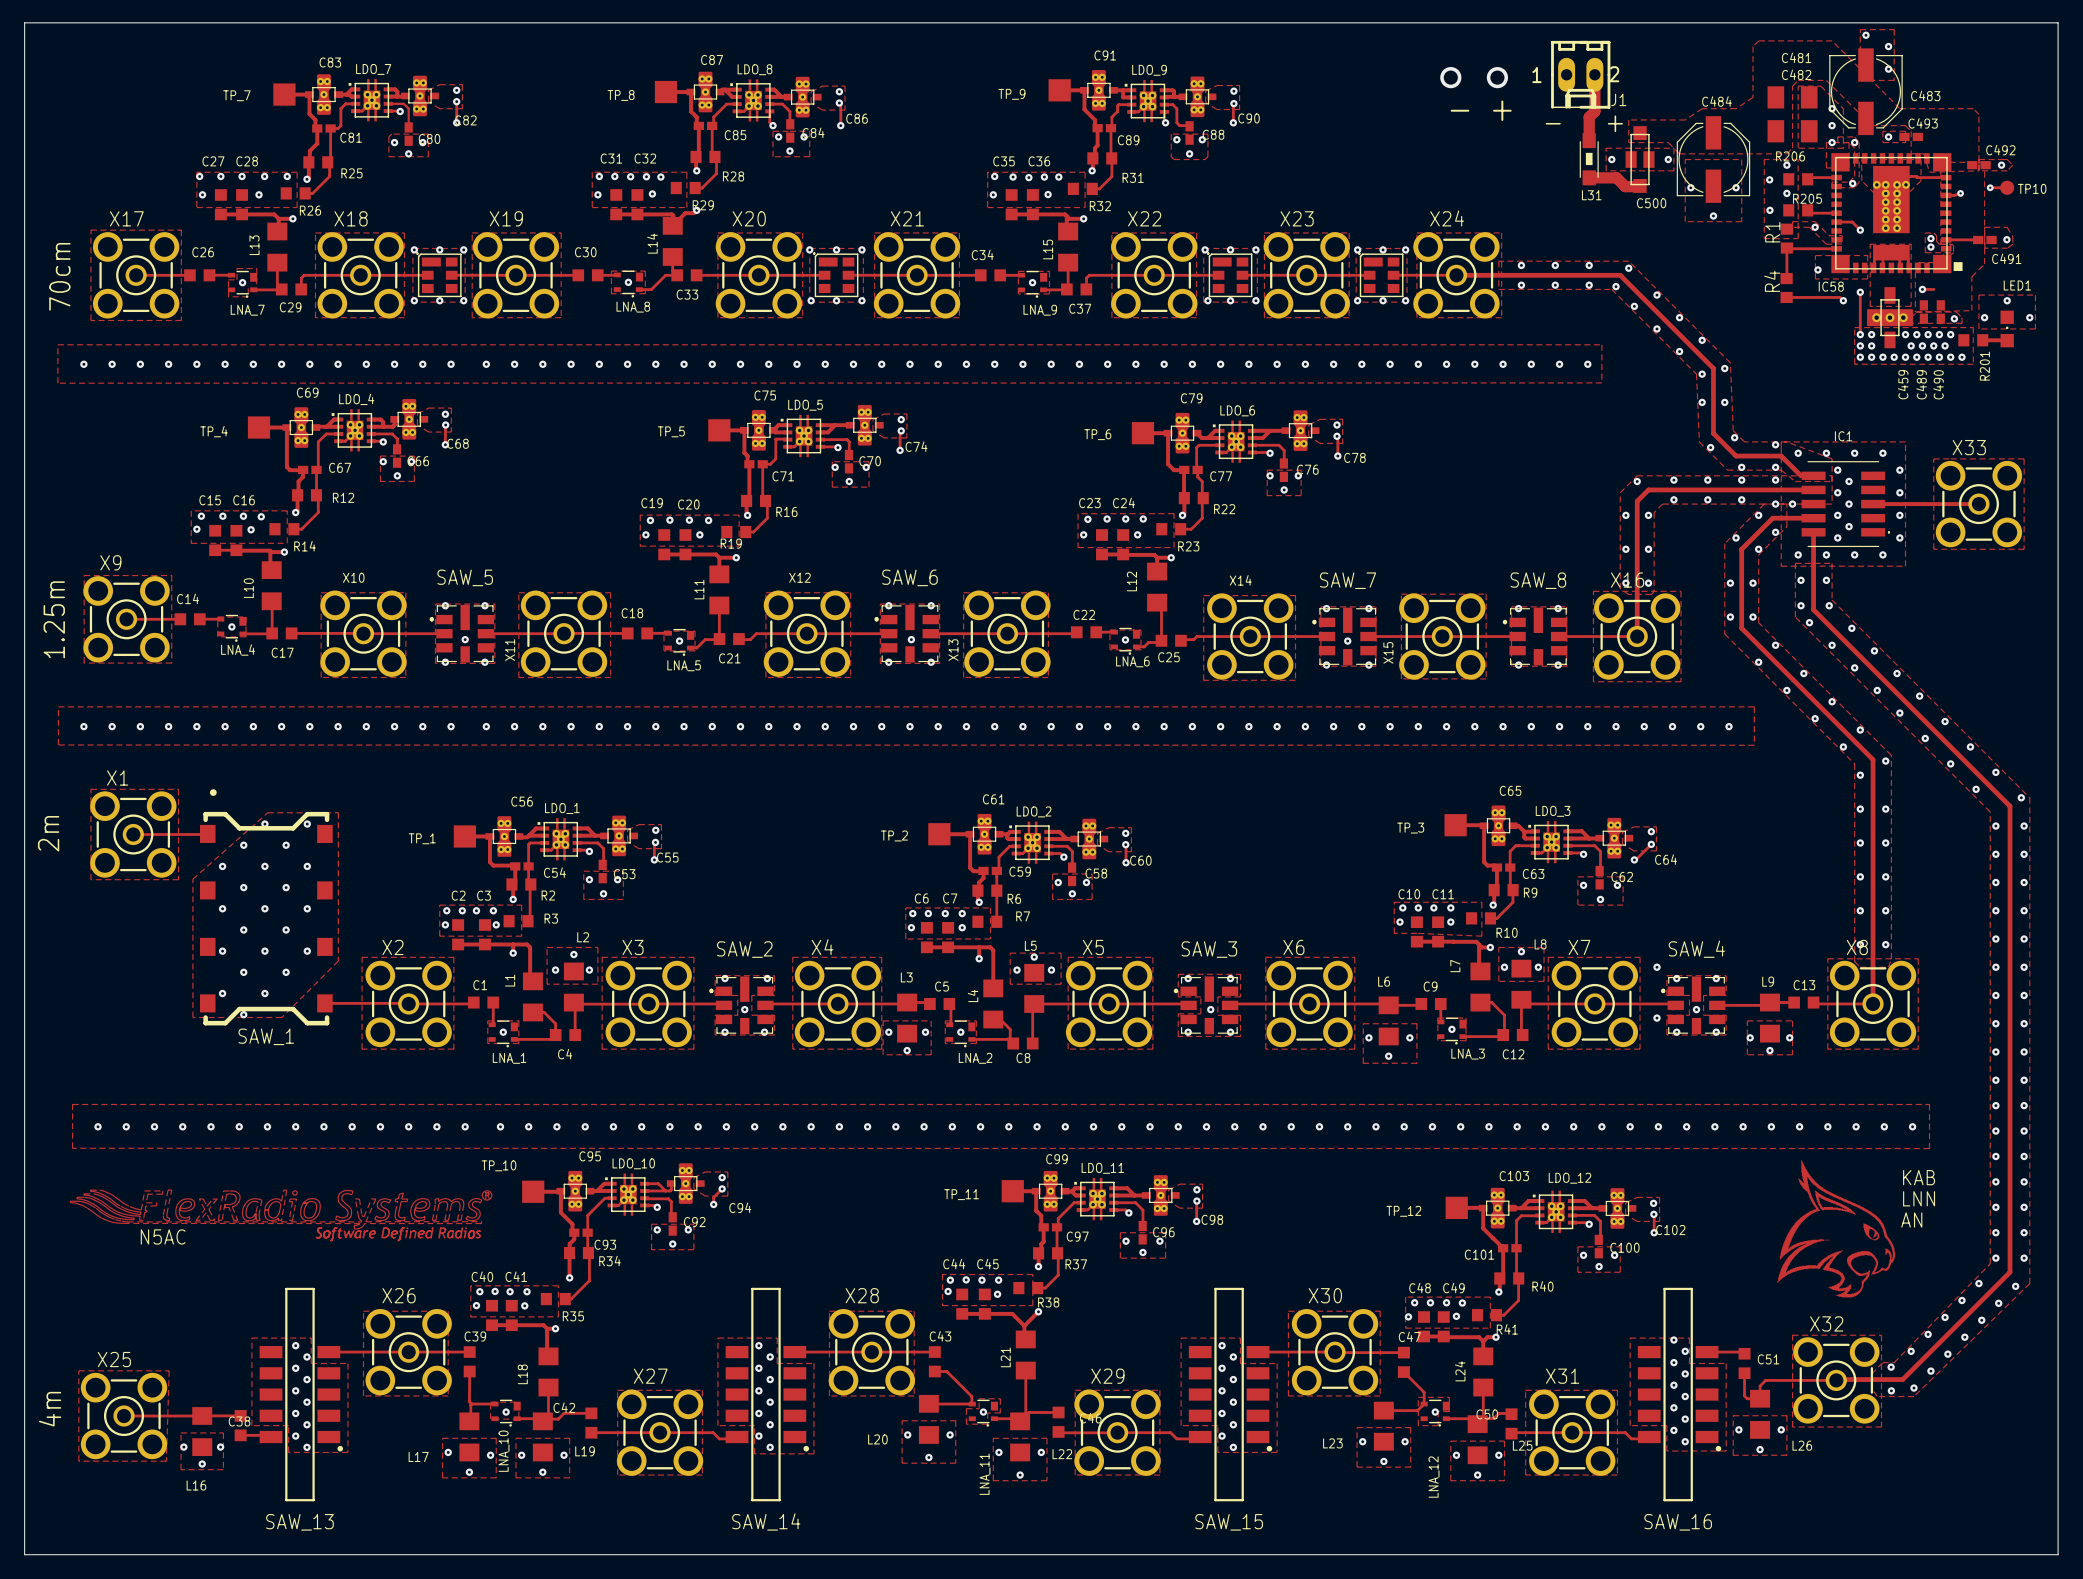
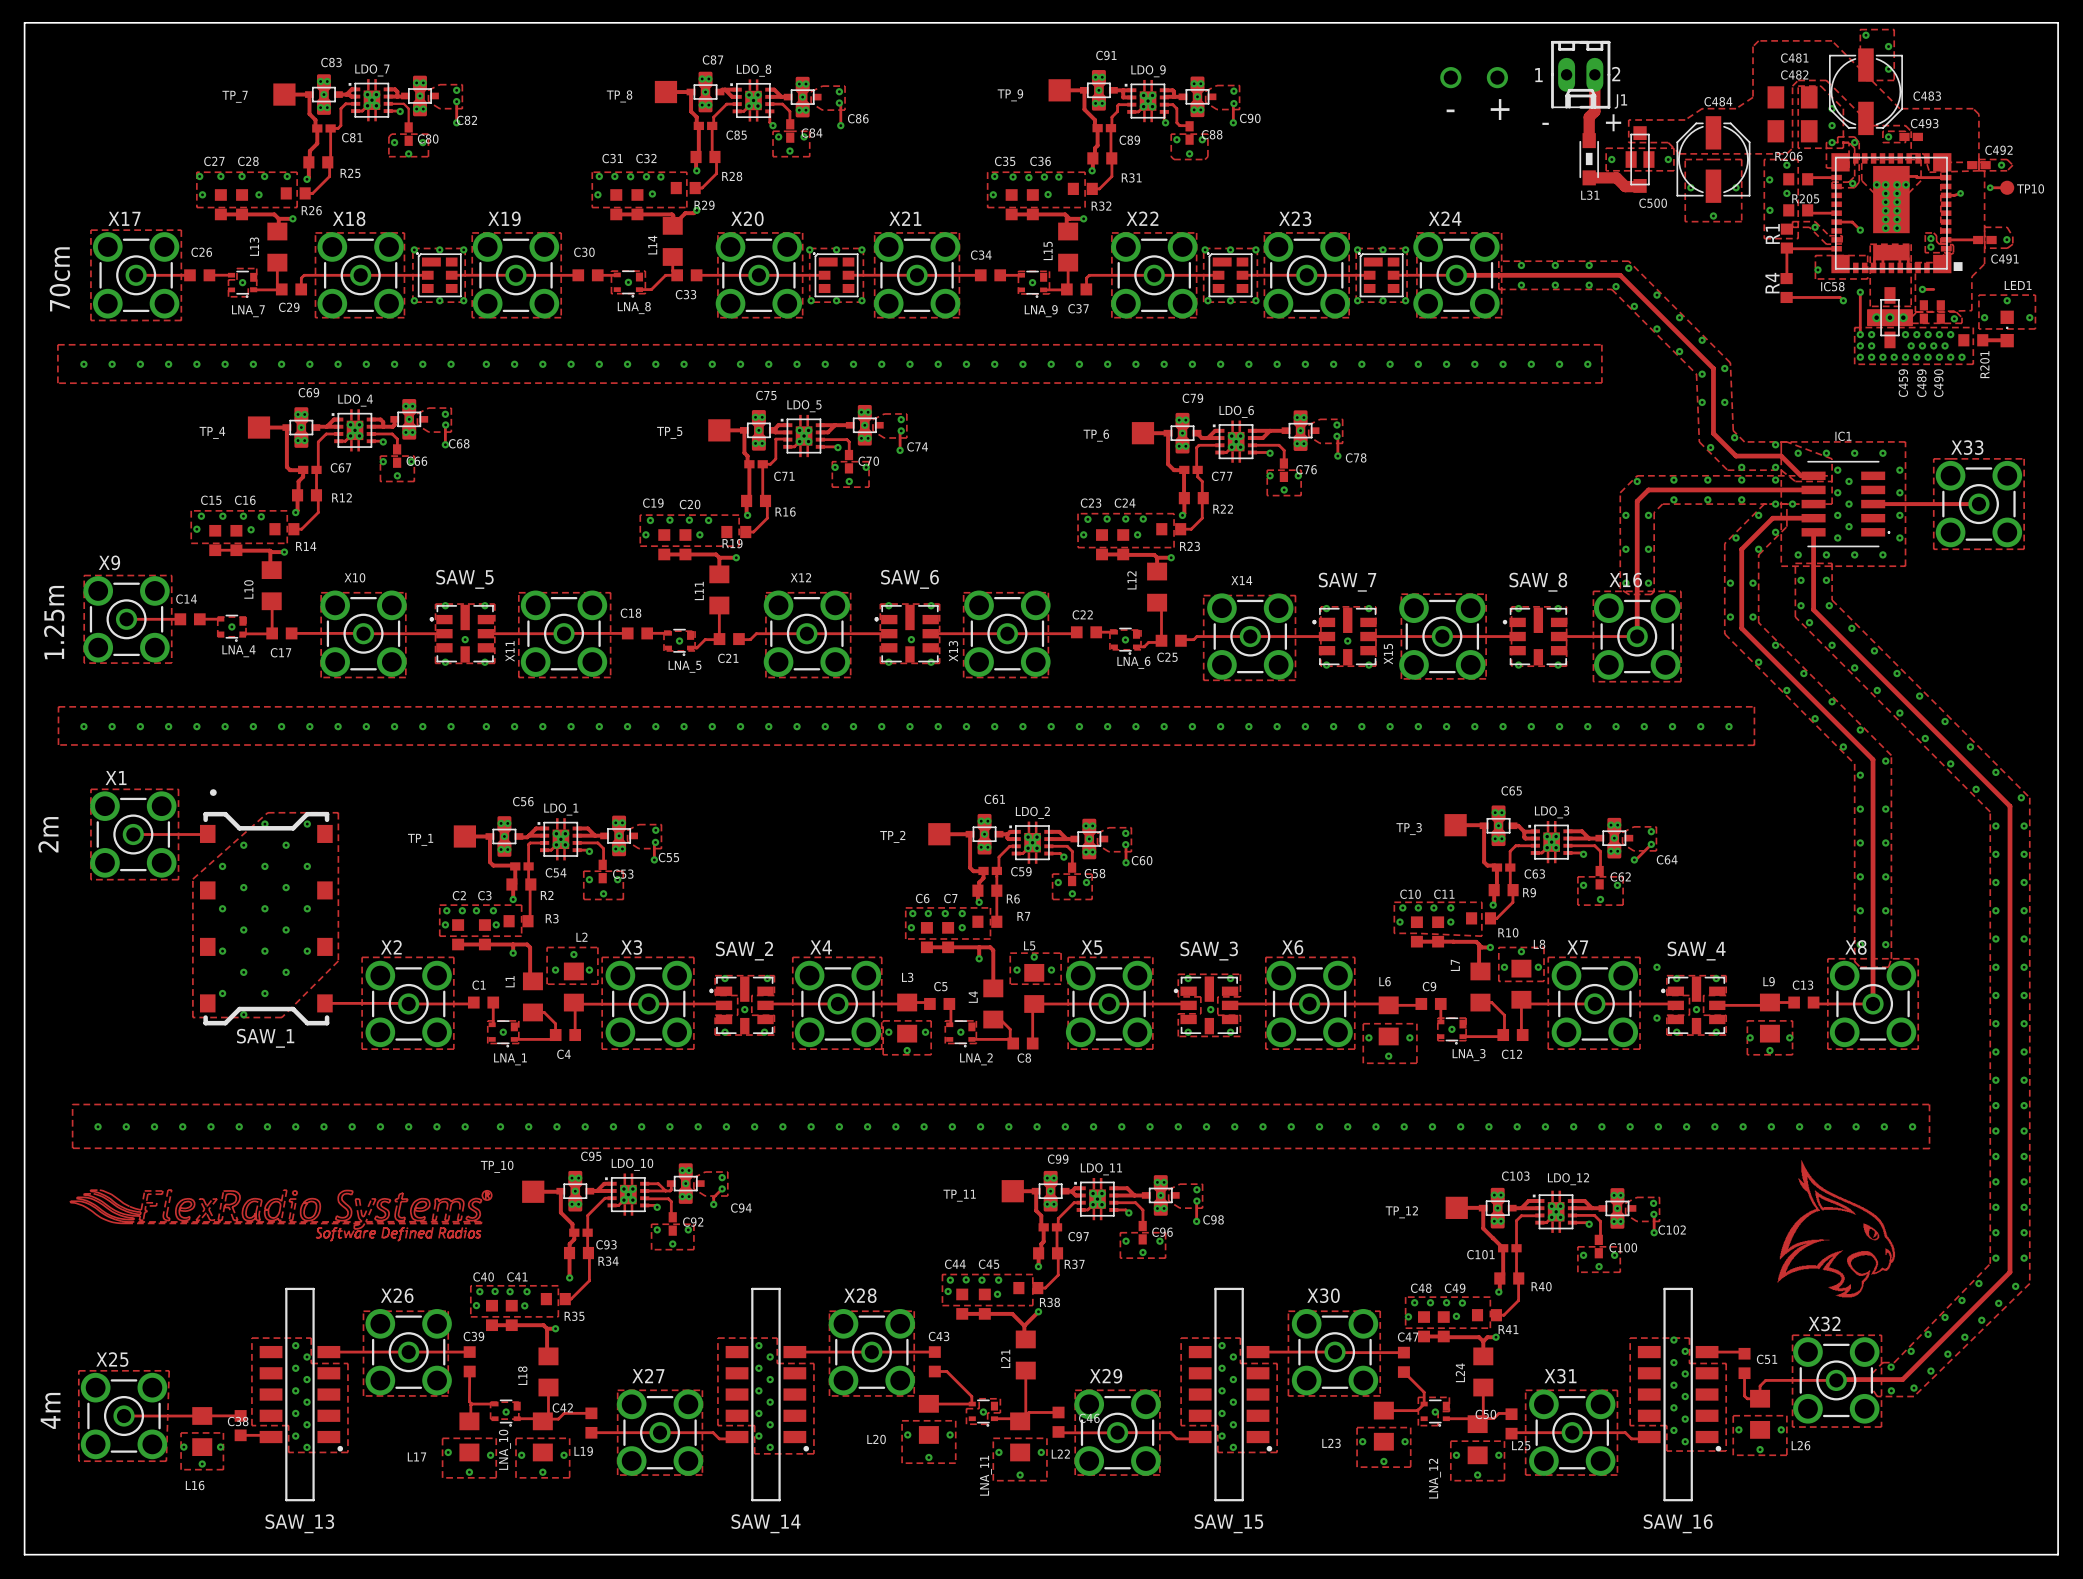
text: KAB (1919, 1177) -> none
text: LNN (1919, 1198) -> none
text: AN (1911, 1220) -> none
text: N5AC (163, 1236) -> none

